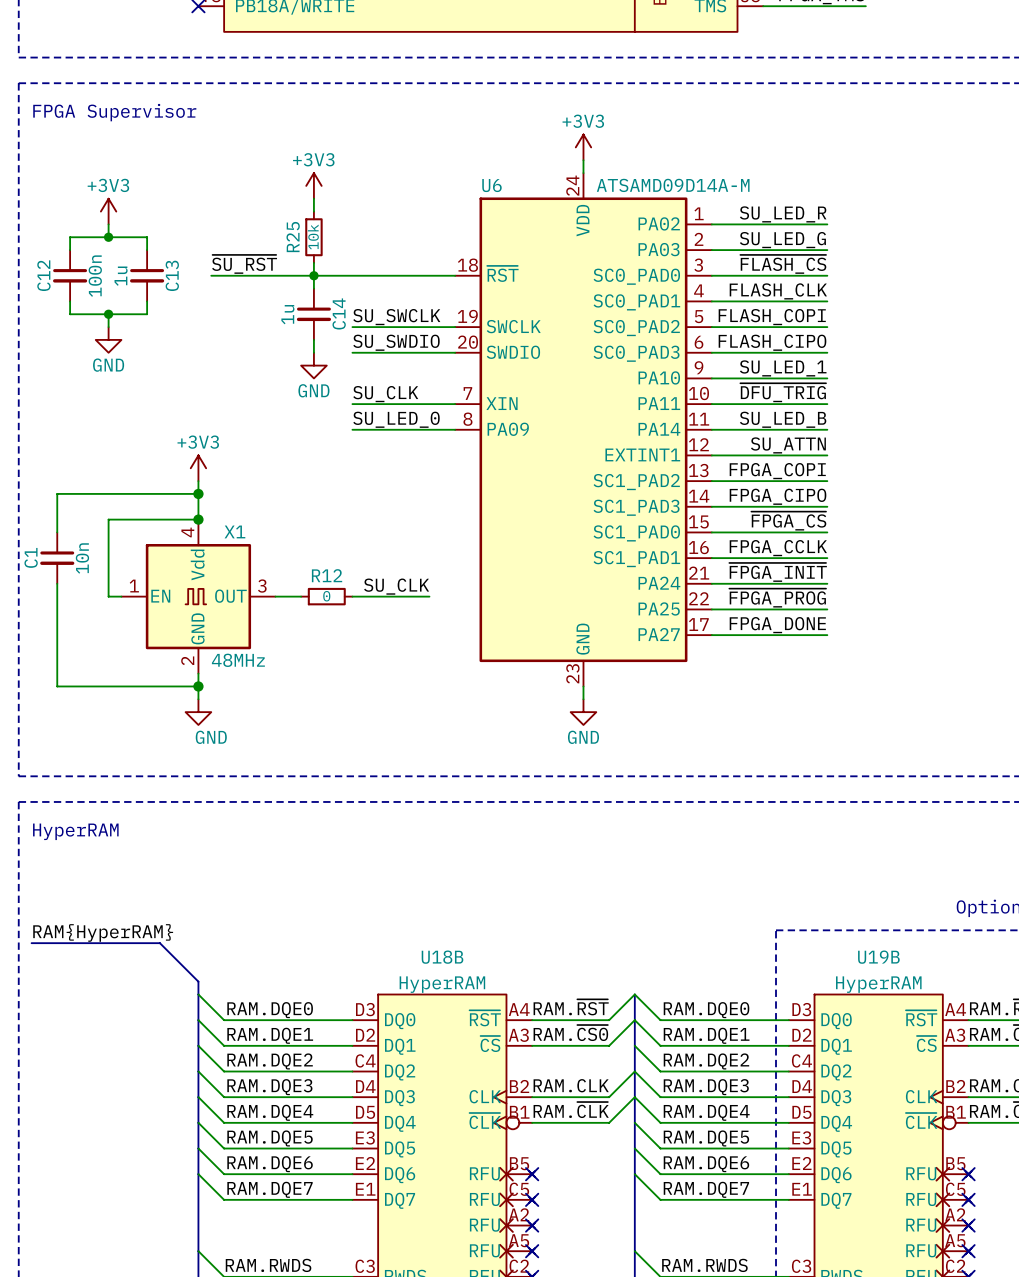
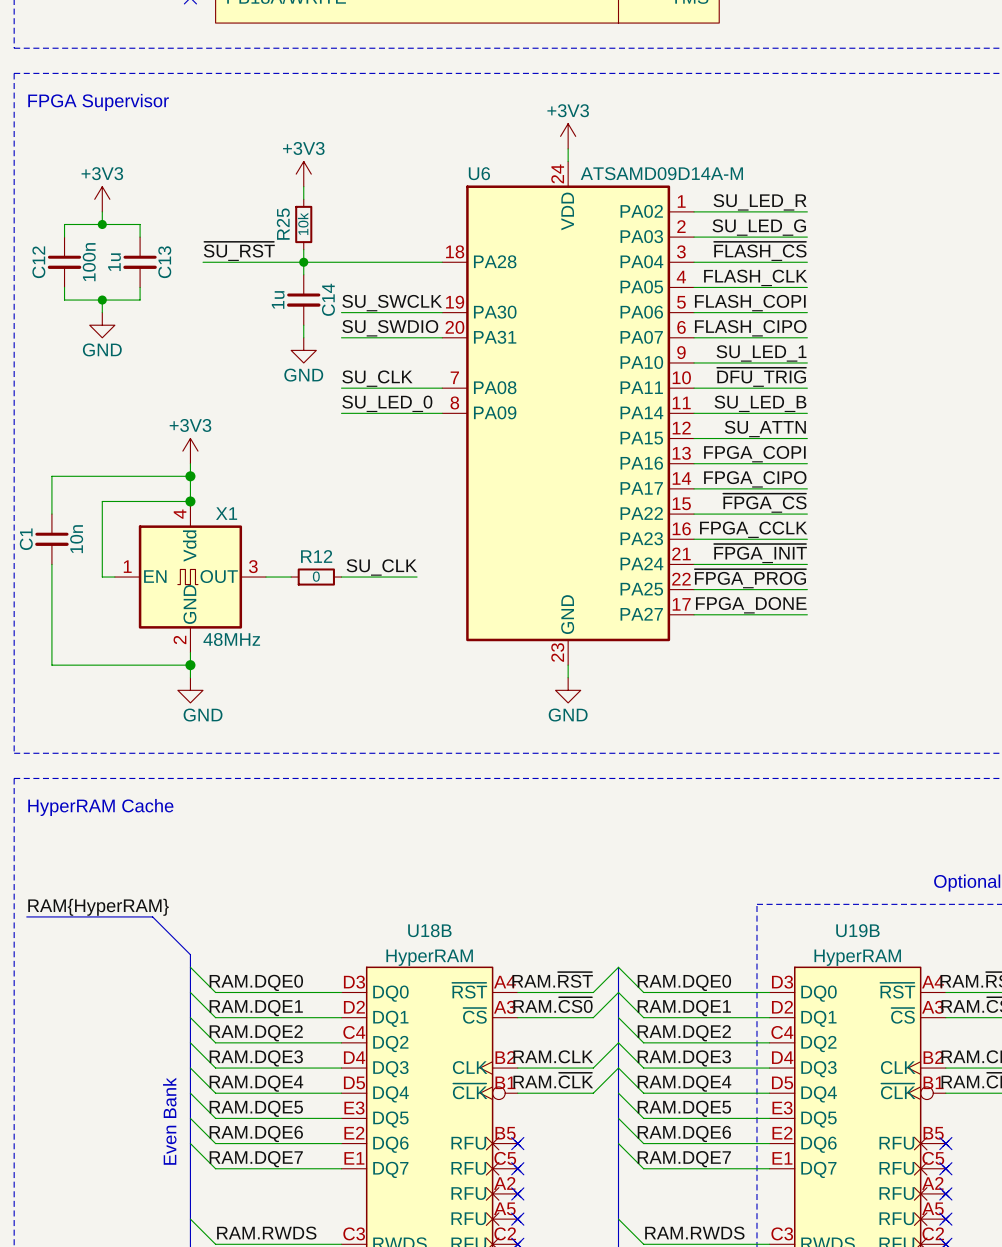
U6 symbol: [455, 173, 712, 687] -> [442, 161, 695, 666]
text: HyperRAM (75, 831) -> HyperRAM Cache (100, 807)
text: none -> Even Bank (169, 1121)

